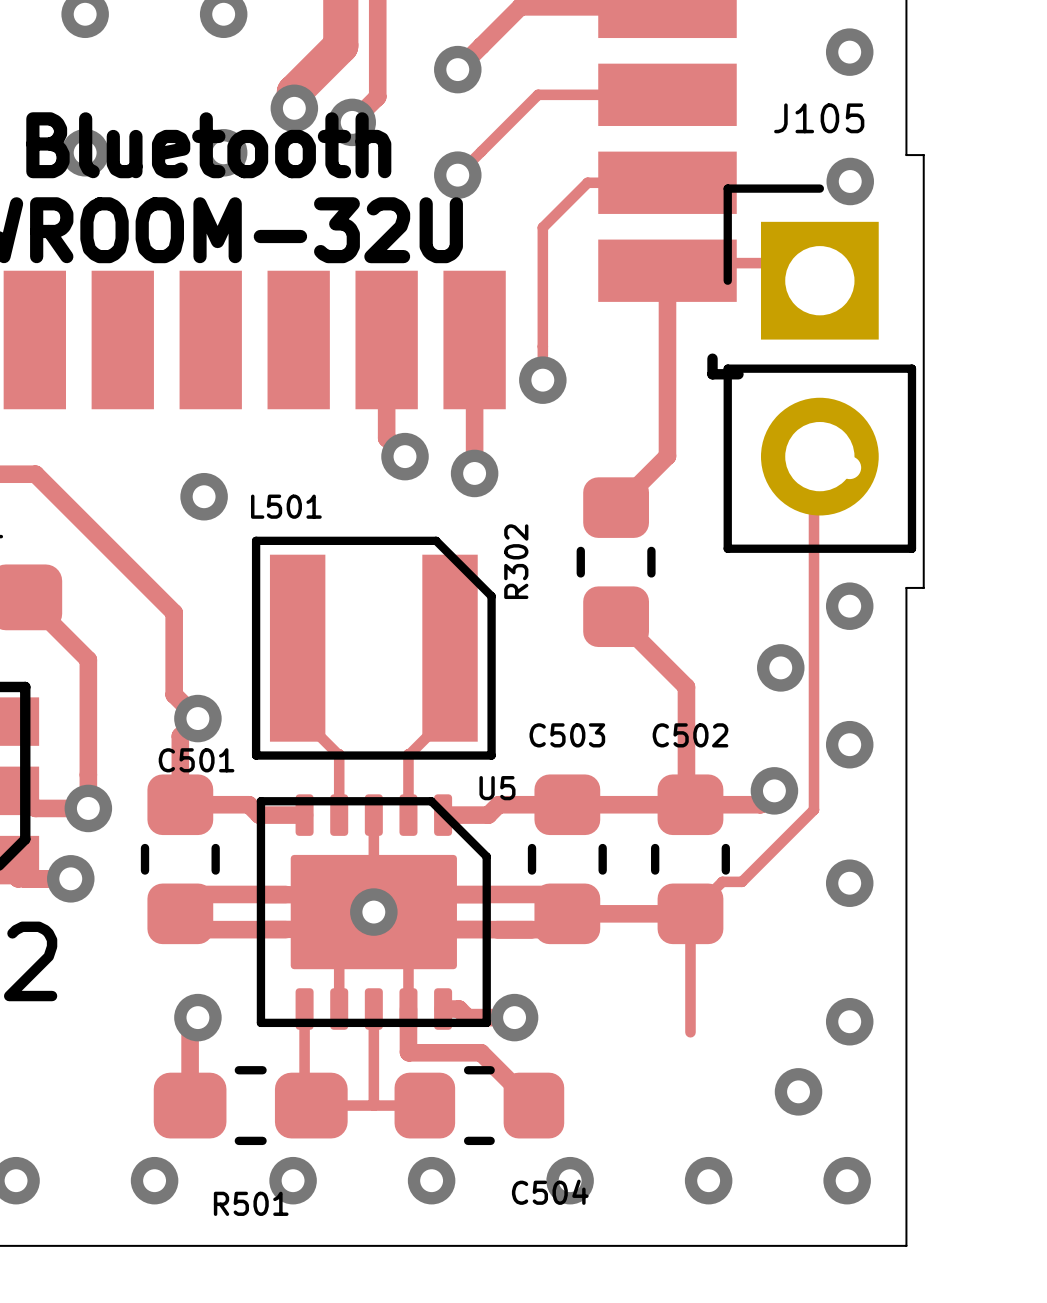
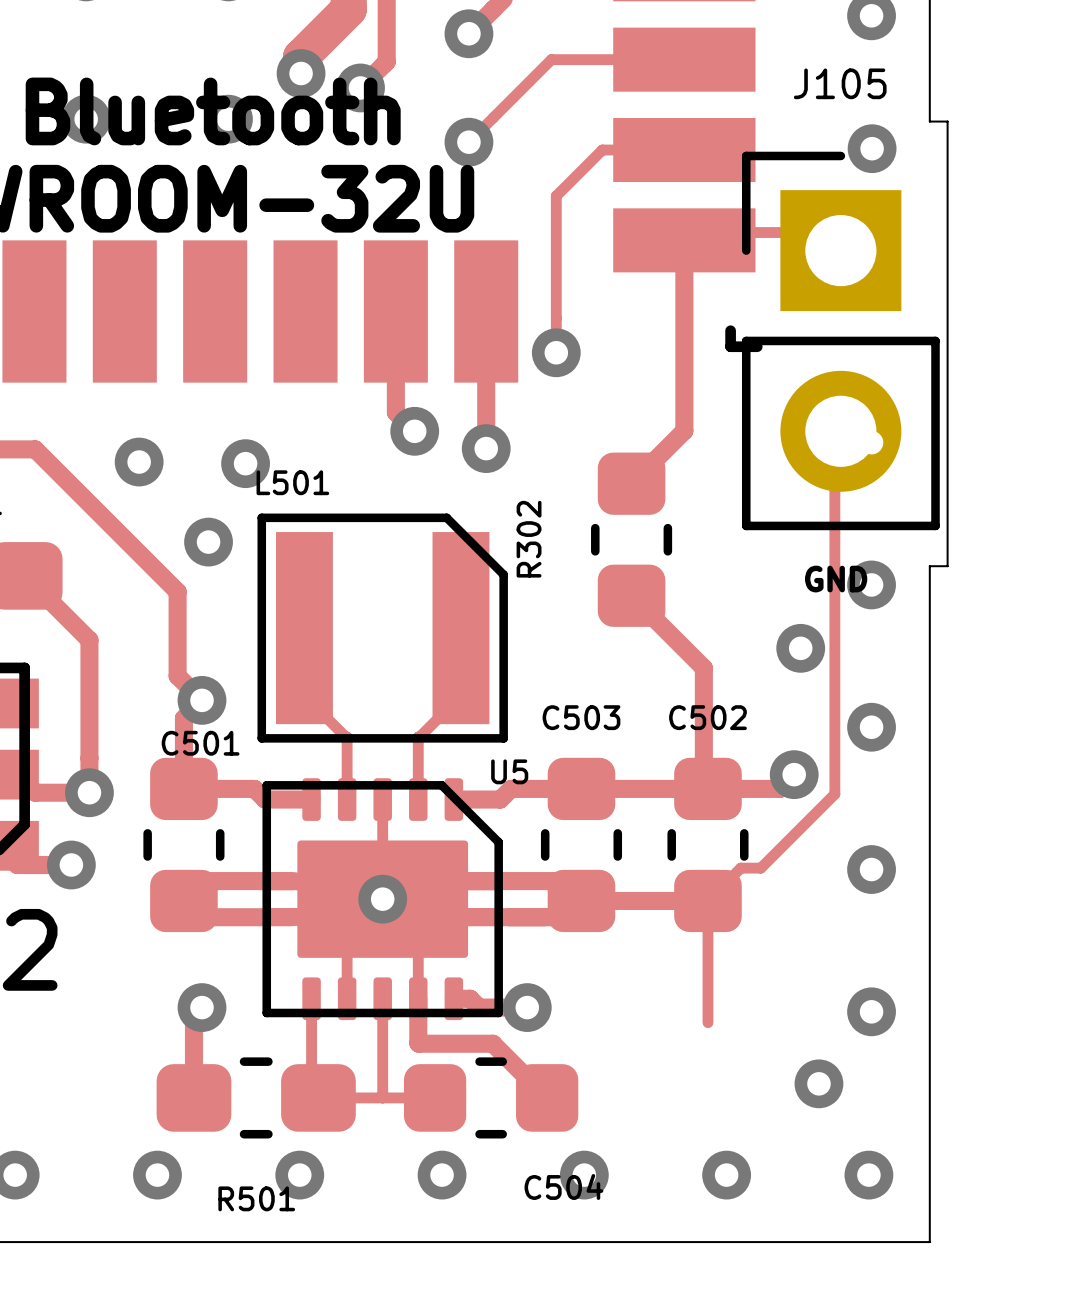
via: none -> (139, 462)
via position: (204, 496) -> (245, 463)
via: none -> (208, 542)
text: none -> GND (836, 579)

